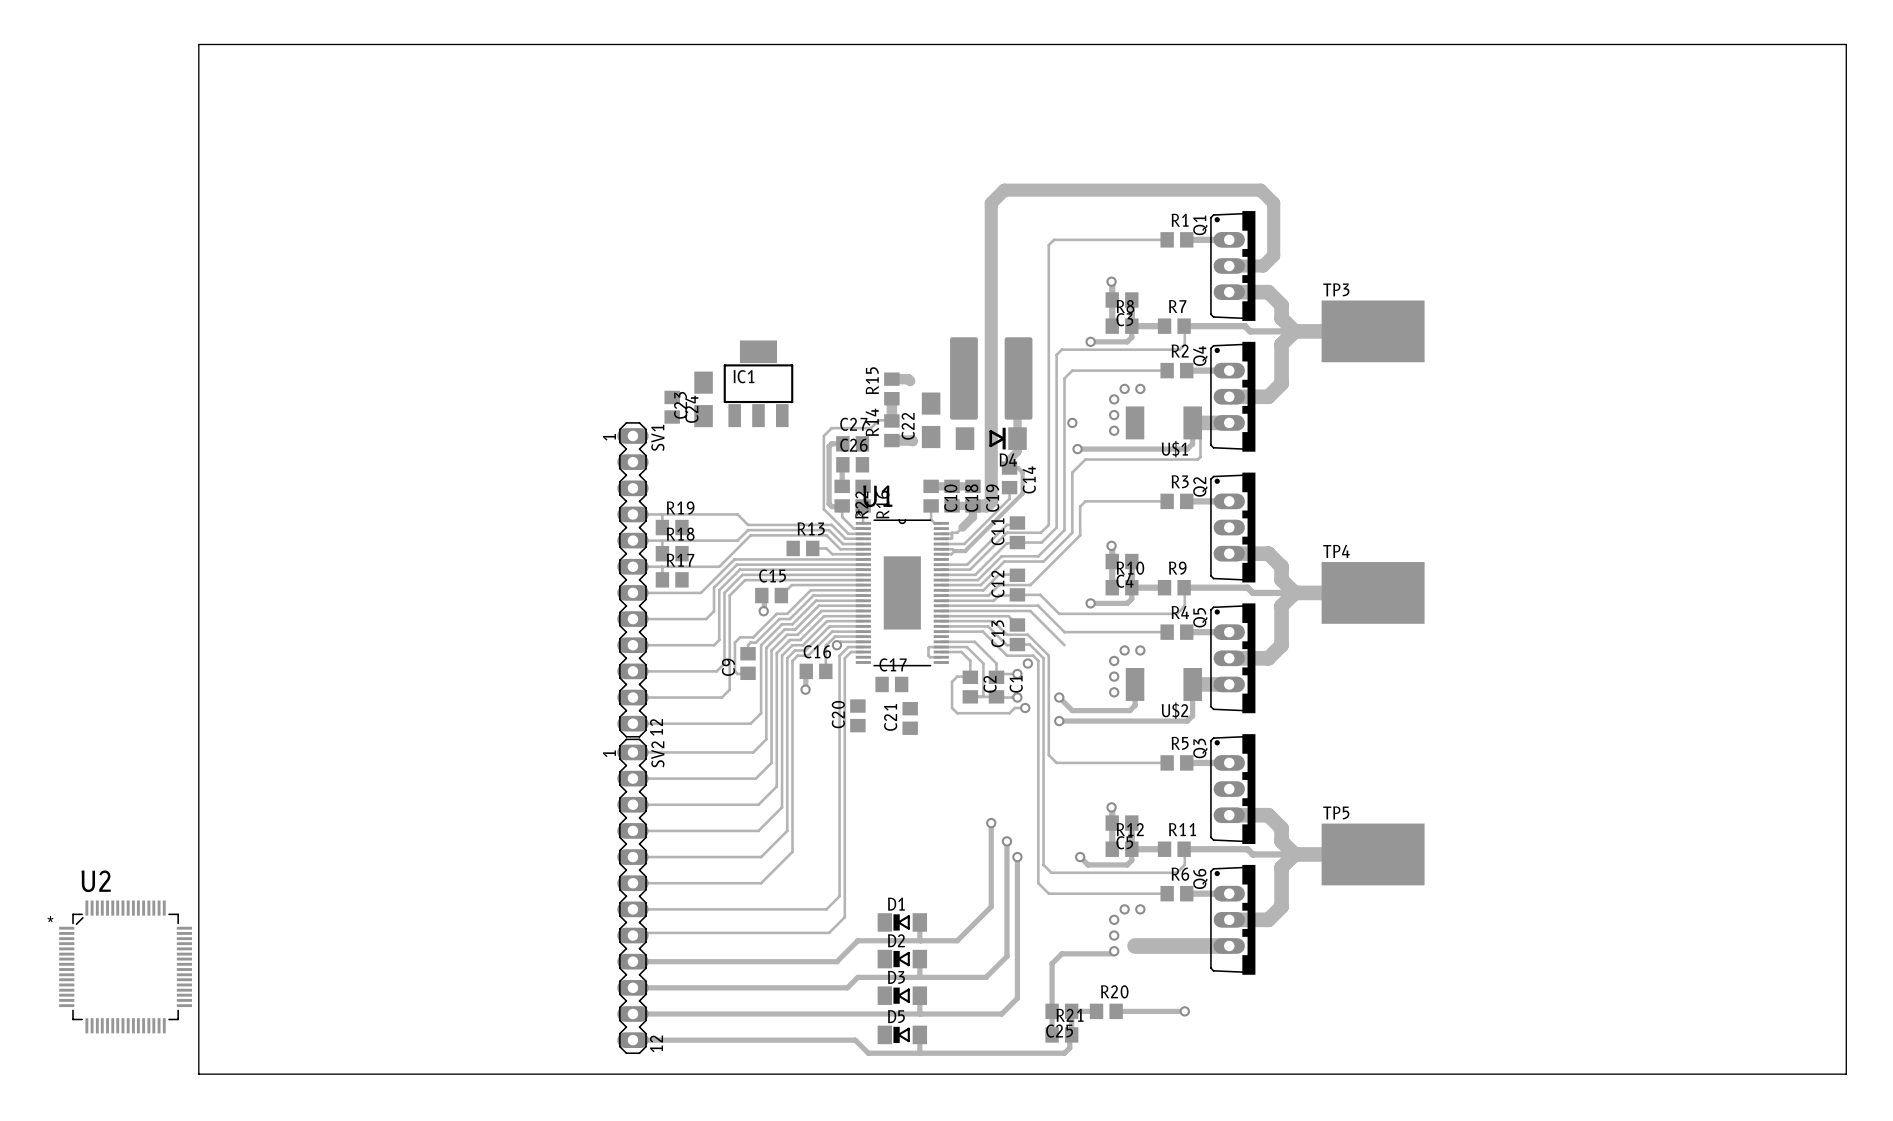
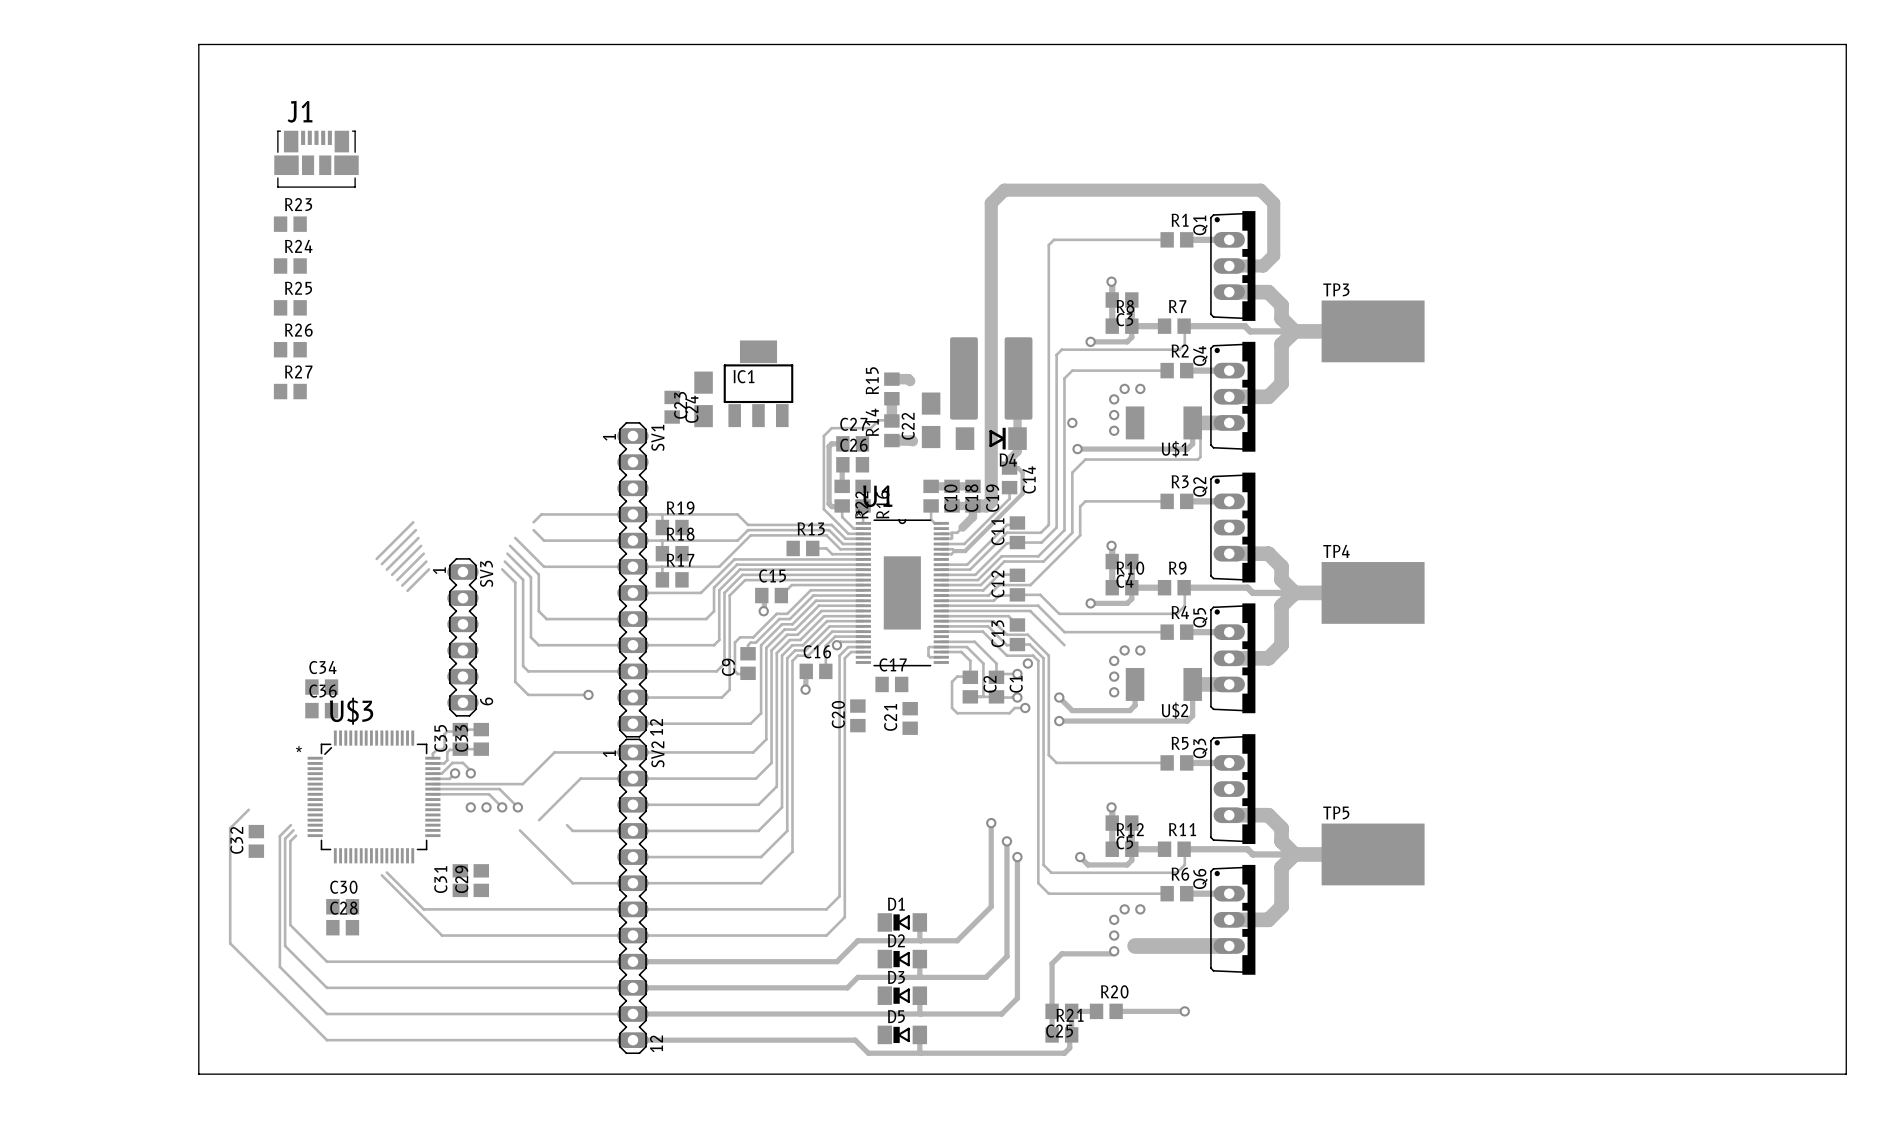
J1: none -> (316, 159)
R23: none -> (290, 224)
R24: none -> (290, 266)
R25: none -> (290, 307)
R26: none -> (290, 349)
R27: none -> (290, 391)
track: none -> (632, 514) (541, 514) (533, 522)
track: none -> (413, 522) (376, 558)
track: none -> (415, 530) (381, 564)
track: none -> (533, 530) (544, 540) (632, 540)
track: none -> (418, 538) (386, 569)
track: none -> (515, 538) (544, 566) (632, 566)
track: none -> (421, 545) (392, 574)
track: none -> (510, 545) (538, 574) (538, 611) (546, 619) (632, 619)
track: none -> (423, 553) (397, 580)
track: none -> (507, 553) (530, 577) (530, 637) (538, 645) (632, 645)
track: none -> (426, 561) (402, 585)
track: none -> (504, 561) (523, 579) (523, 666) (528, 671) (632, 671)
track: none -> (428, 569) (407, 590)
track: none -> (502, 569) (515, 582) (515, 681) (528, 694) (588, 694)
SV3: none -> (462, 637)
C34: none -> (321, 687)
via: none -> (588, 694)
C36: none -> (321, 710)
track: none -> (481, 729) (447, 731) (444, 734) (444, 747) (442, 749) (436, 749) (432, 753) (432, 758)
C35: none -> (460, 739)
C33: none -> (481, 739)
track: none -> (481, 749) (449, 749) (447, 752) (447, 760) (444, 763) (432, 763)
track: none -> (632, 752) (554, 752) (522, 784) (432, 784)
track: none -> (455, 773) (449, 778) (432, 778)
via: none -> (455, 773)
track: none -> (470, 773) (470, 770) (462, 762) (452, 762) (441, 773) (432, 773)
via: none -> (470, 773)
track: none -> (632, 778) (580, 778) (539, 820)
track: none -> (432, 789) (499, 789) (517, 807)
track: none -> (432, 794) (489, 794) (502, 807)
U$3: none -> (374, 796)
via: none -> (470, 807)
via: none -> (486, 807)
via: none -> (502, 807)
via: none -> (517, 807)
track: none -> (248, 809) (230, 828) (230, 943) (326, 1040) (632, 1040)
track: none -> (290, 825) (279, 836) (279, 966) (326, 1013) (632, 1013)
track: none -> (567, 825) (572, 830) (632, 830)
track: none -> (293, 830) (285, 838) (285, 945) (326, 987) (632, 987)
track: none -> (519, 830) (572, 883) (632, 883)
track: none -> (296, 835) (290, 841) (290, 925) (326, 961) (632, 961)
C32: none -> (256, 841)
track: none -> (386, 872) (423, 909) (632, 909)
C31: none -> (460, 880)
C29: none -> (481, 880)
C30: none -> (342, 906)
C28: none -> (342, 927)
track: (829, 932) (635, 932) (632, 935) -> (829, 932) (826, 935) (442, 935) (381, 875)
U2: (125, 966) -> none

